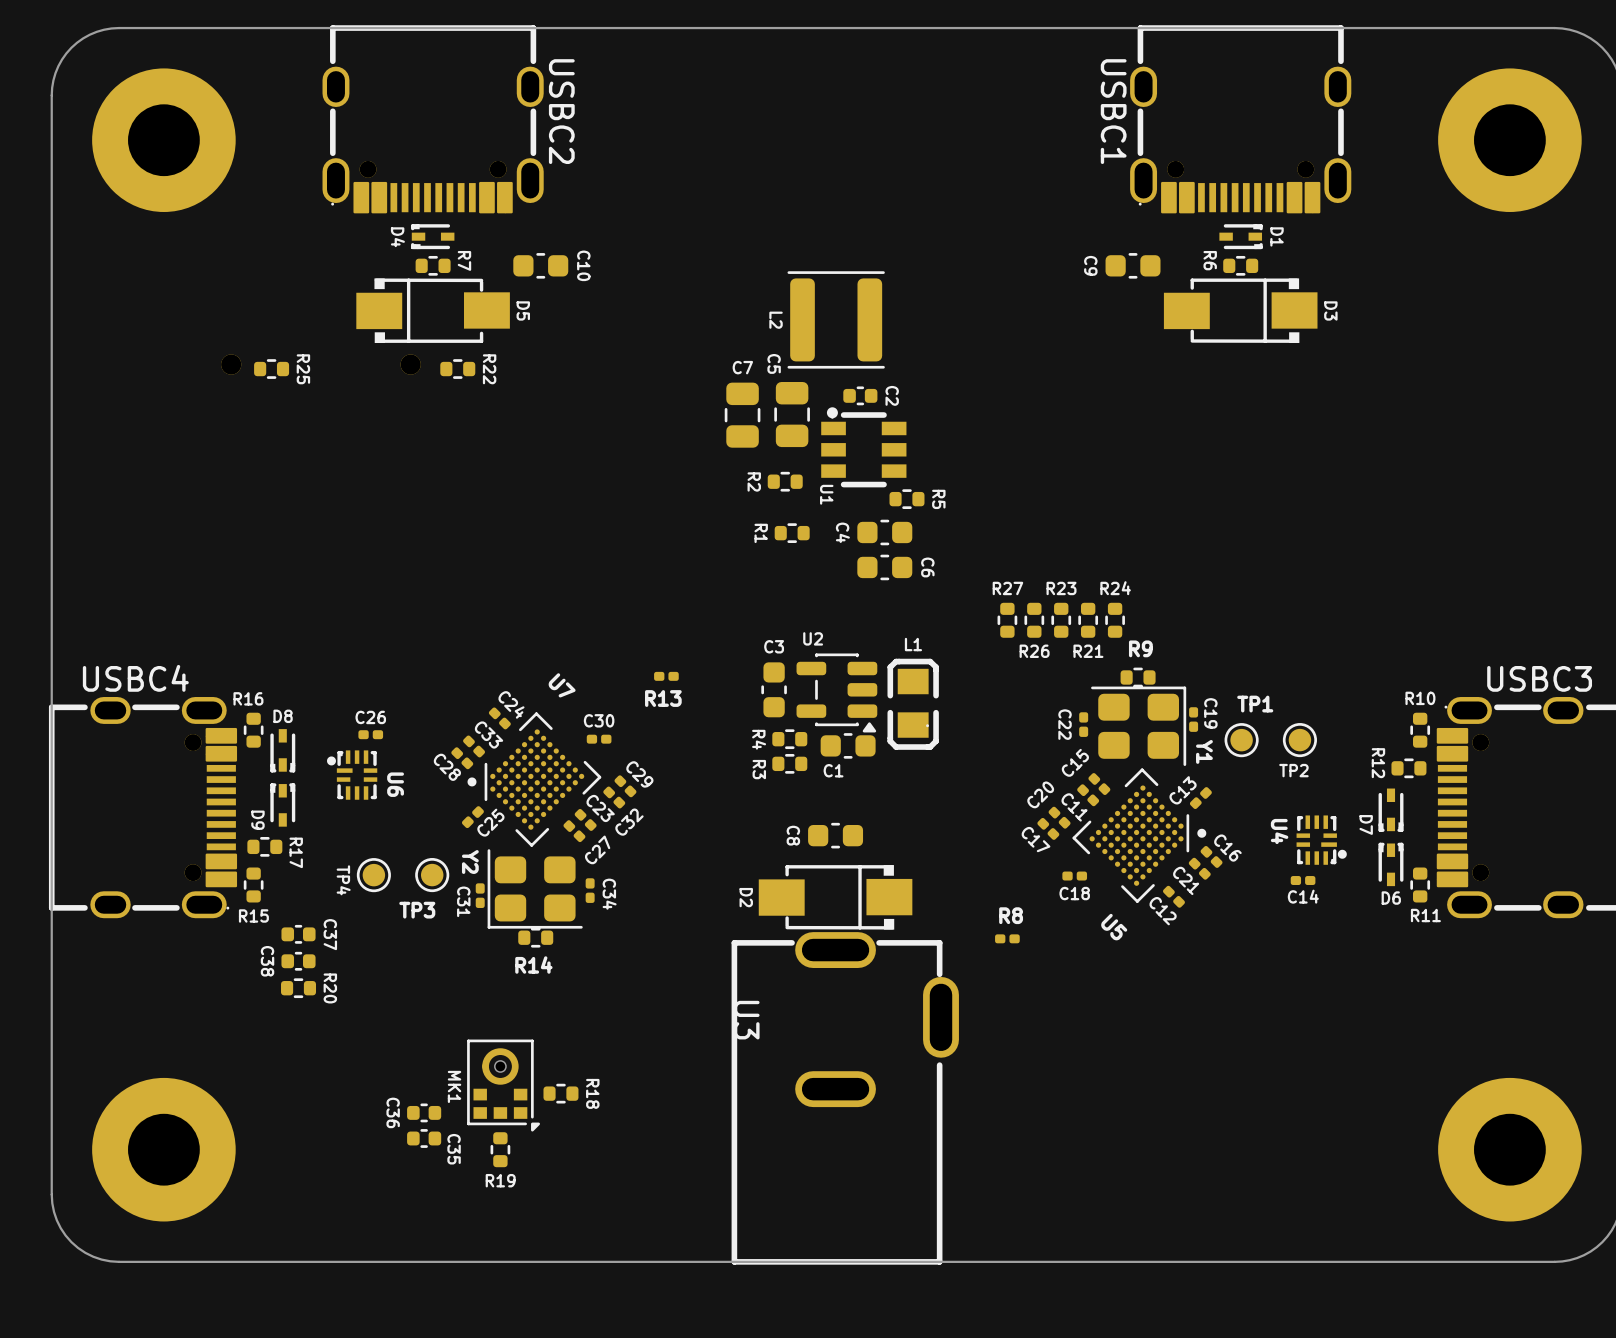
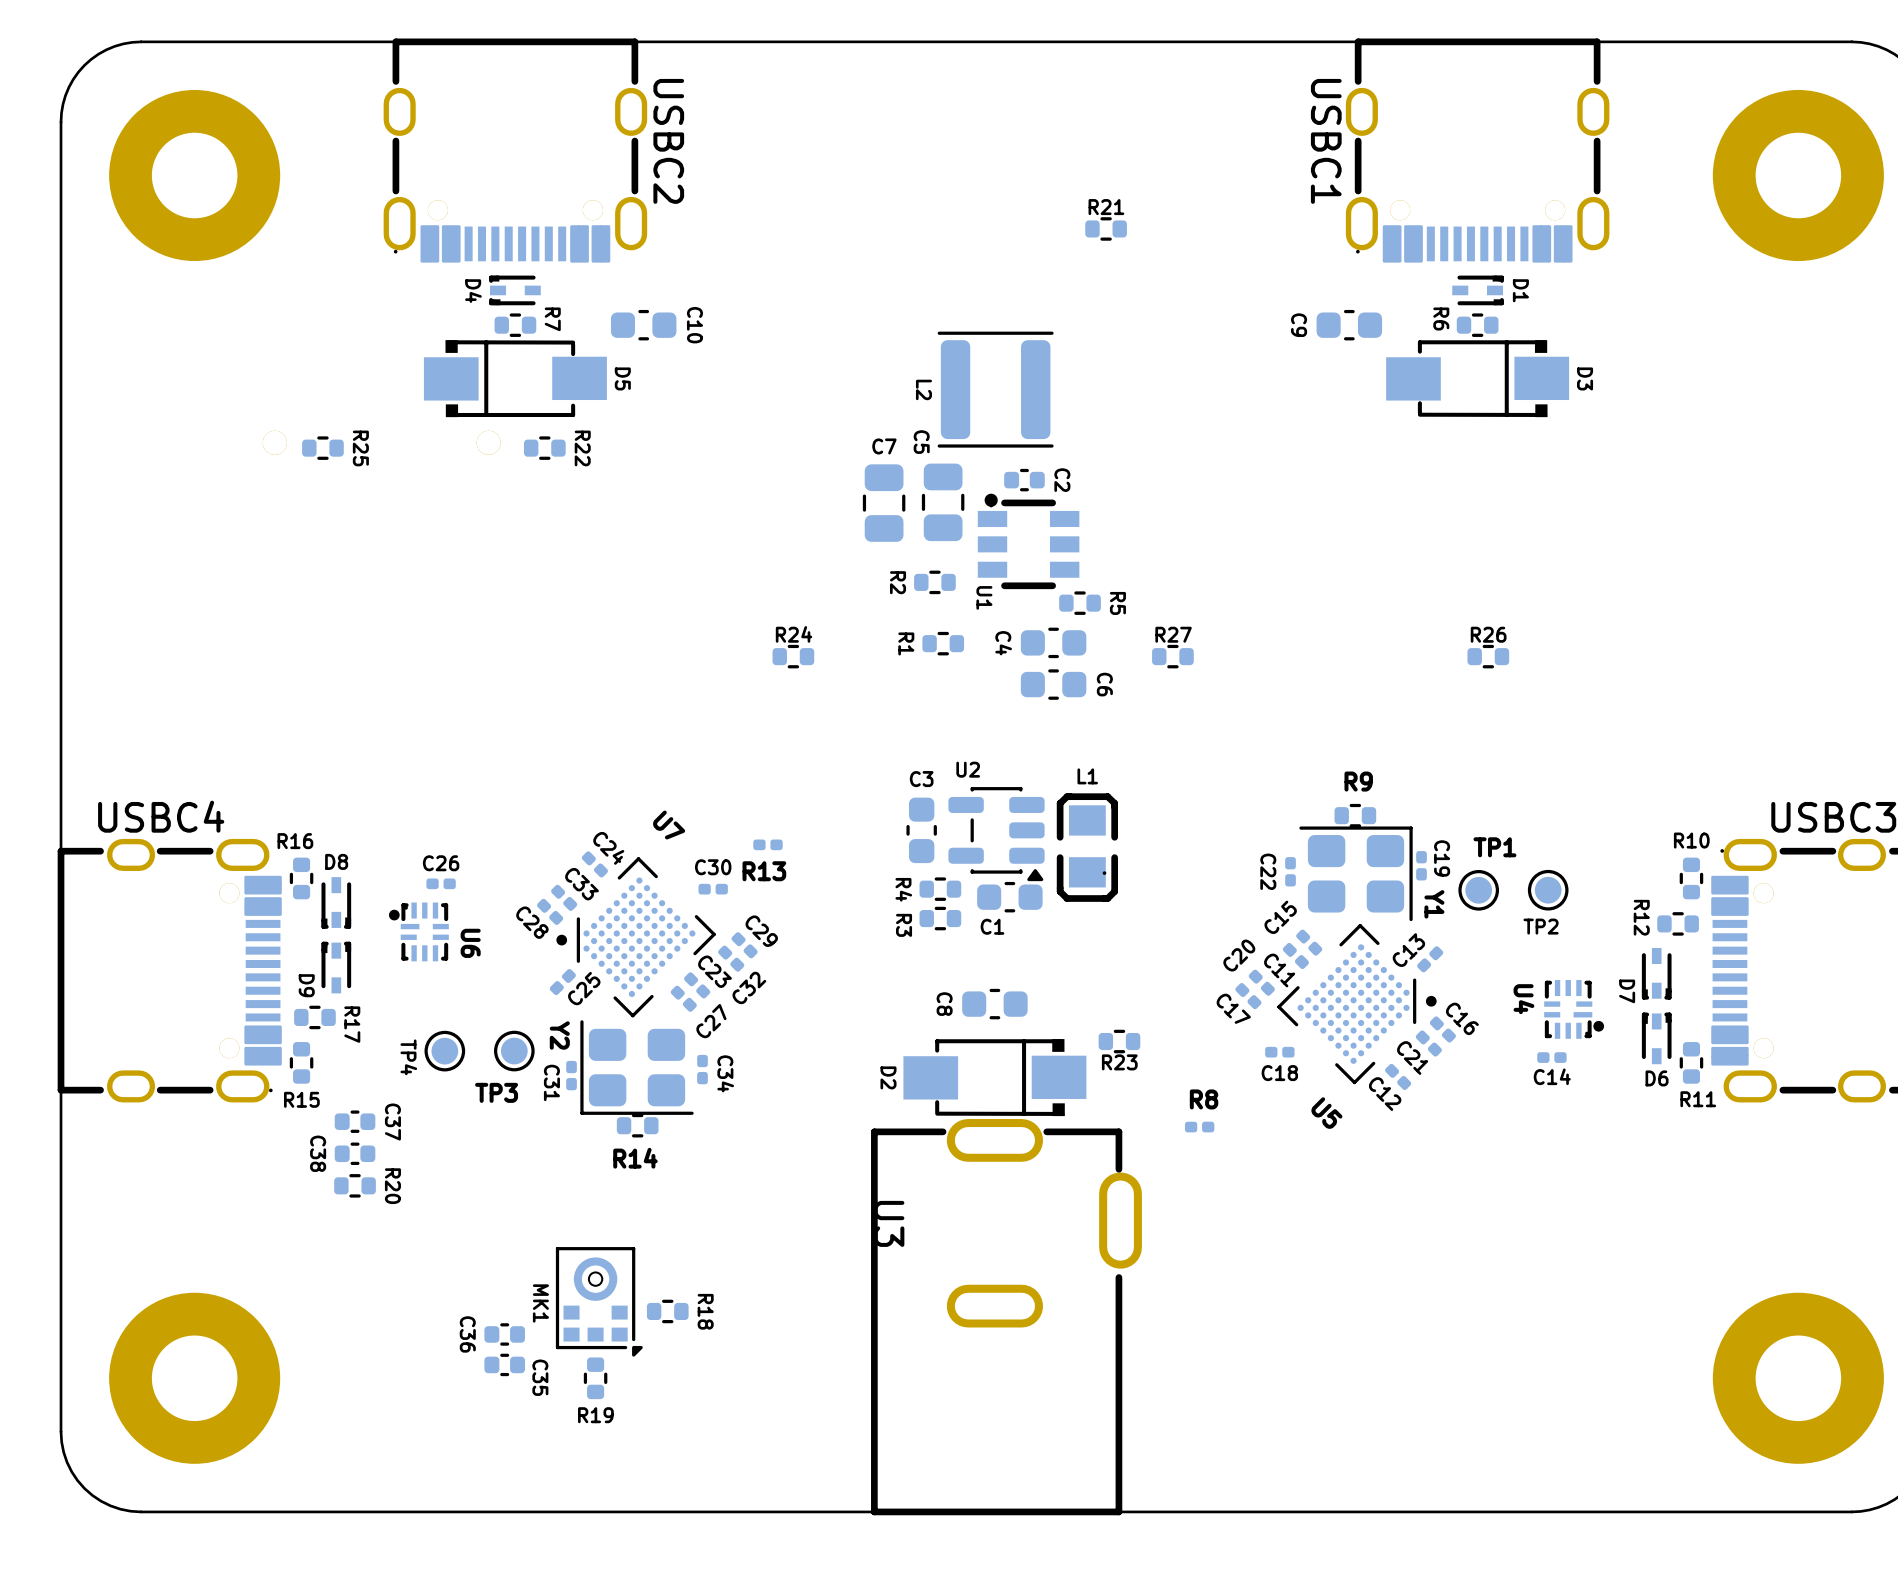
R27 rotation: 0° (1007, 620) -> 90° clockwise (1172, 656)
R27 position: (1007, 620) -> (1172, 656)
R26 rotation: 0° (1034, 620) -> 90° clockwise (1488, 656)
R26 position: (1034, 620) -> (1488, 656)
R23 rotation: 0° (1061, 620) -> 90° clockwise (1119, 1041)
R23 position: (1061, 620) -> (1119, 1041)
R21 rotation: 0° (1088, 620) -> 90° clockwise (1106, 228)
R21 position: (1088, 620) -> (1106, 228)
R24 rotation: 0° (1115, 620) -> 90° clockwise (793, 656)
R24 position: (1115, 620) -> (793, 656)
R13 position: (666, 676) -> (768, 844)

